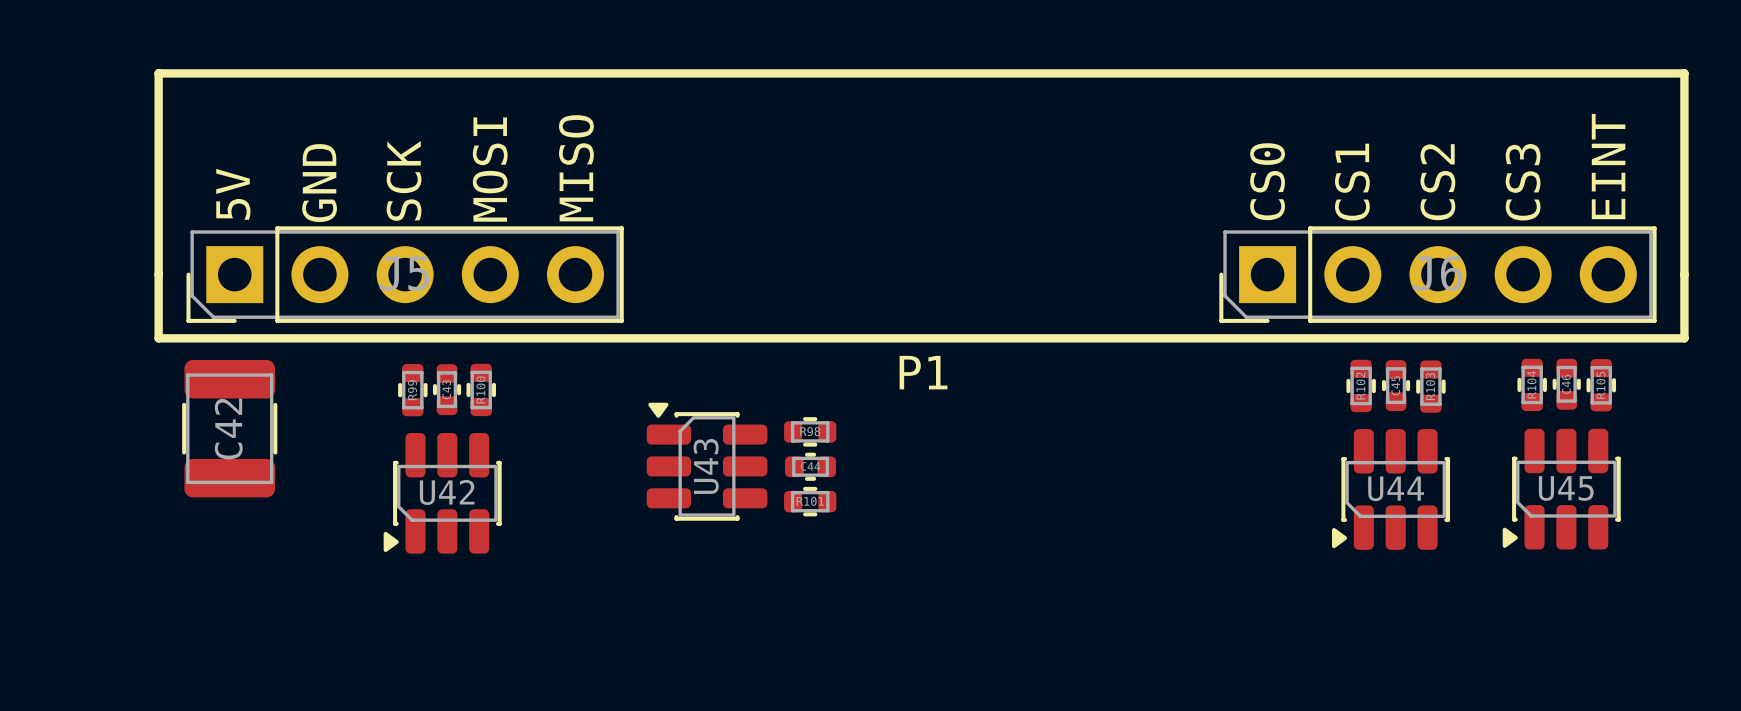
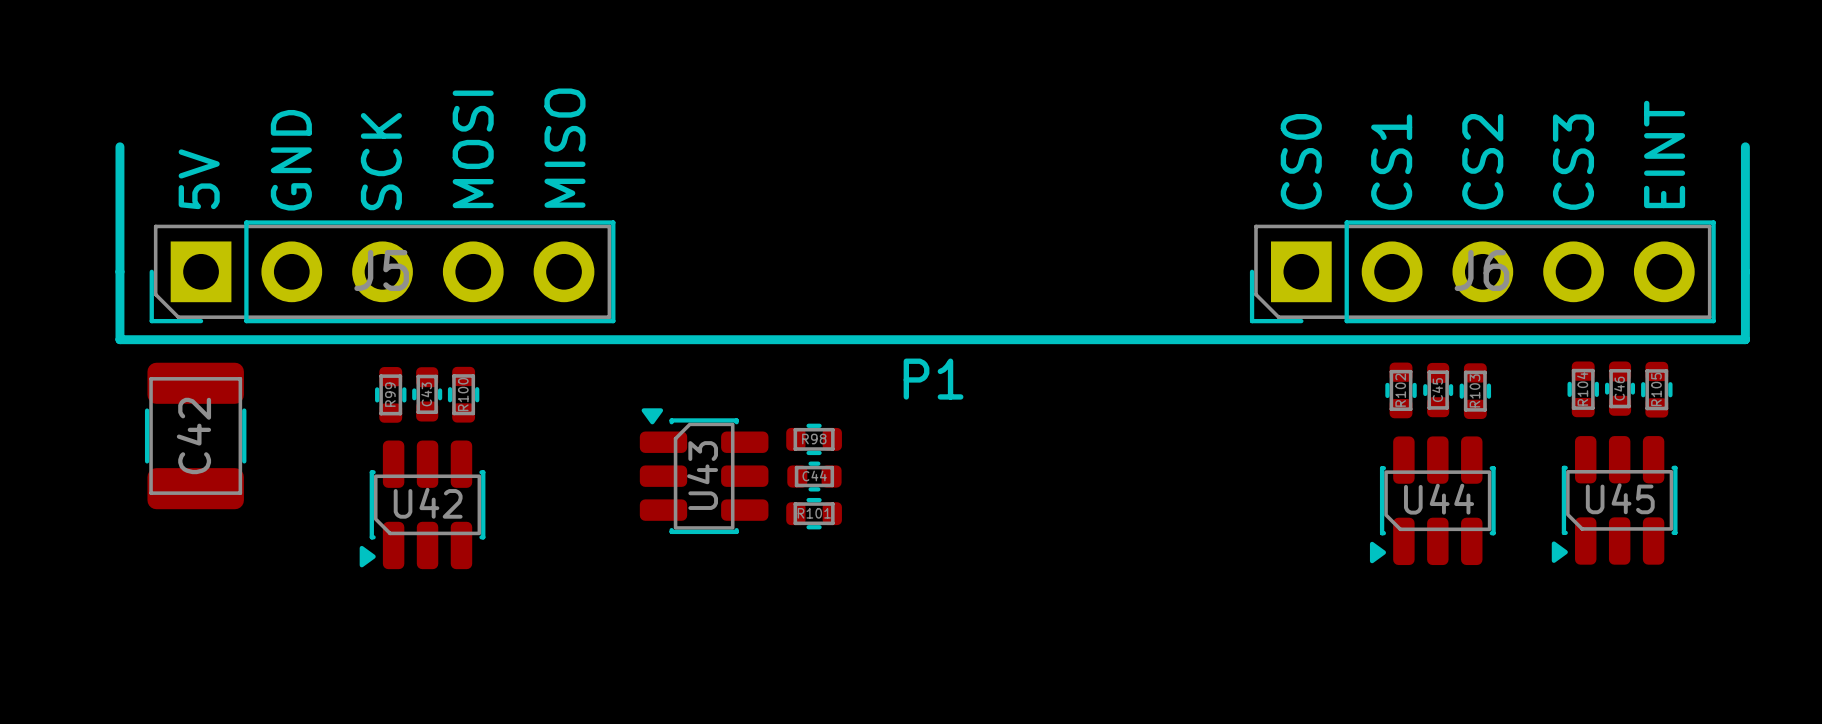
P1 footprint: [154, 69, 1689, 343] -> [115, 142, 1750, 345]

